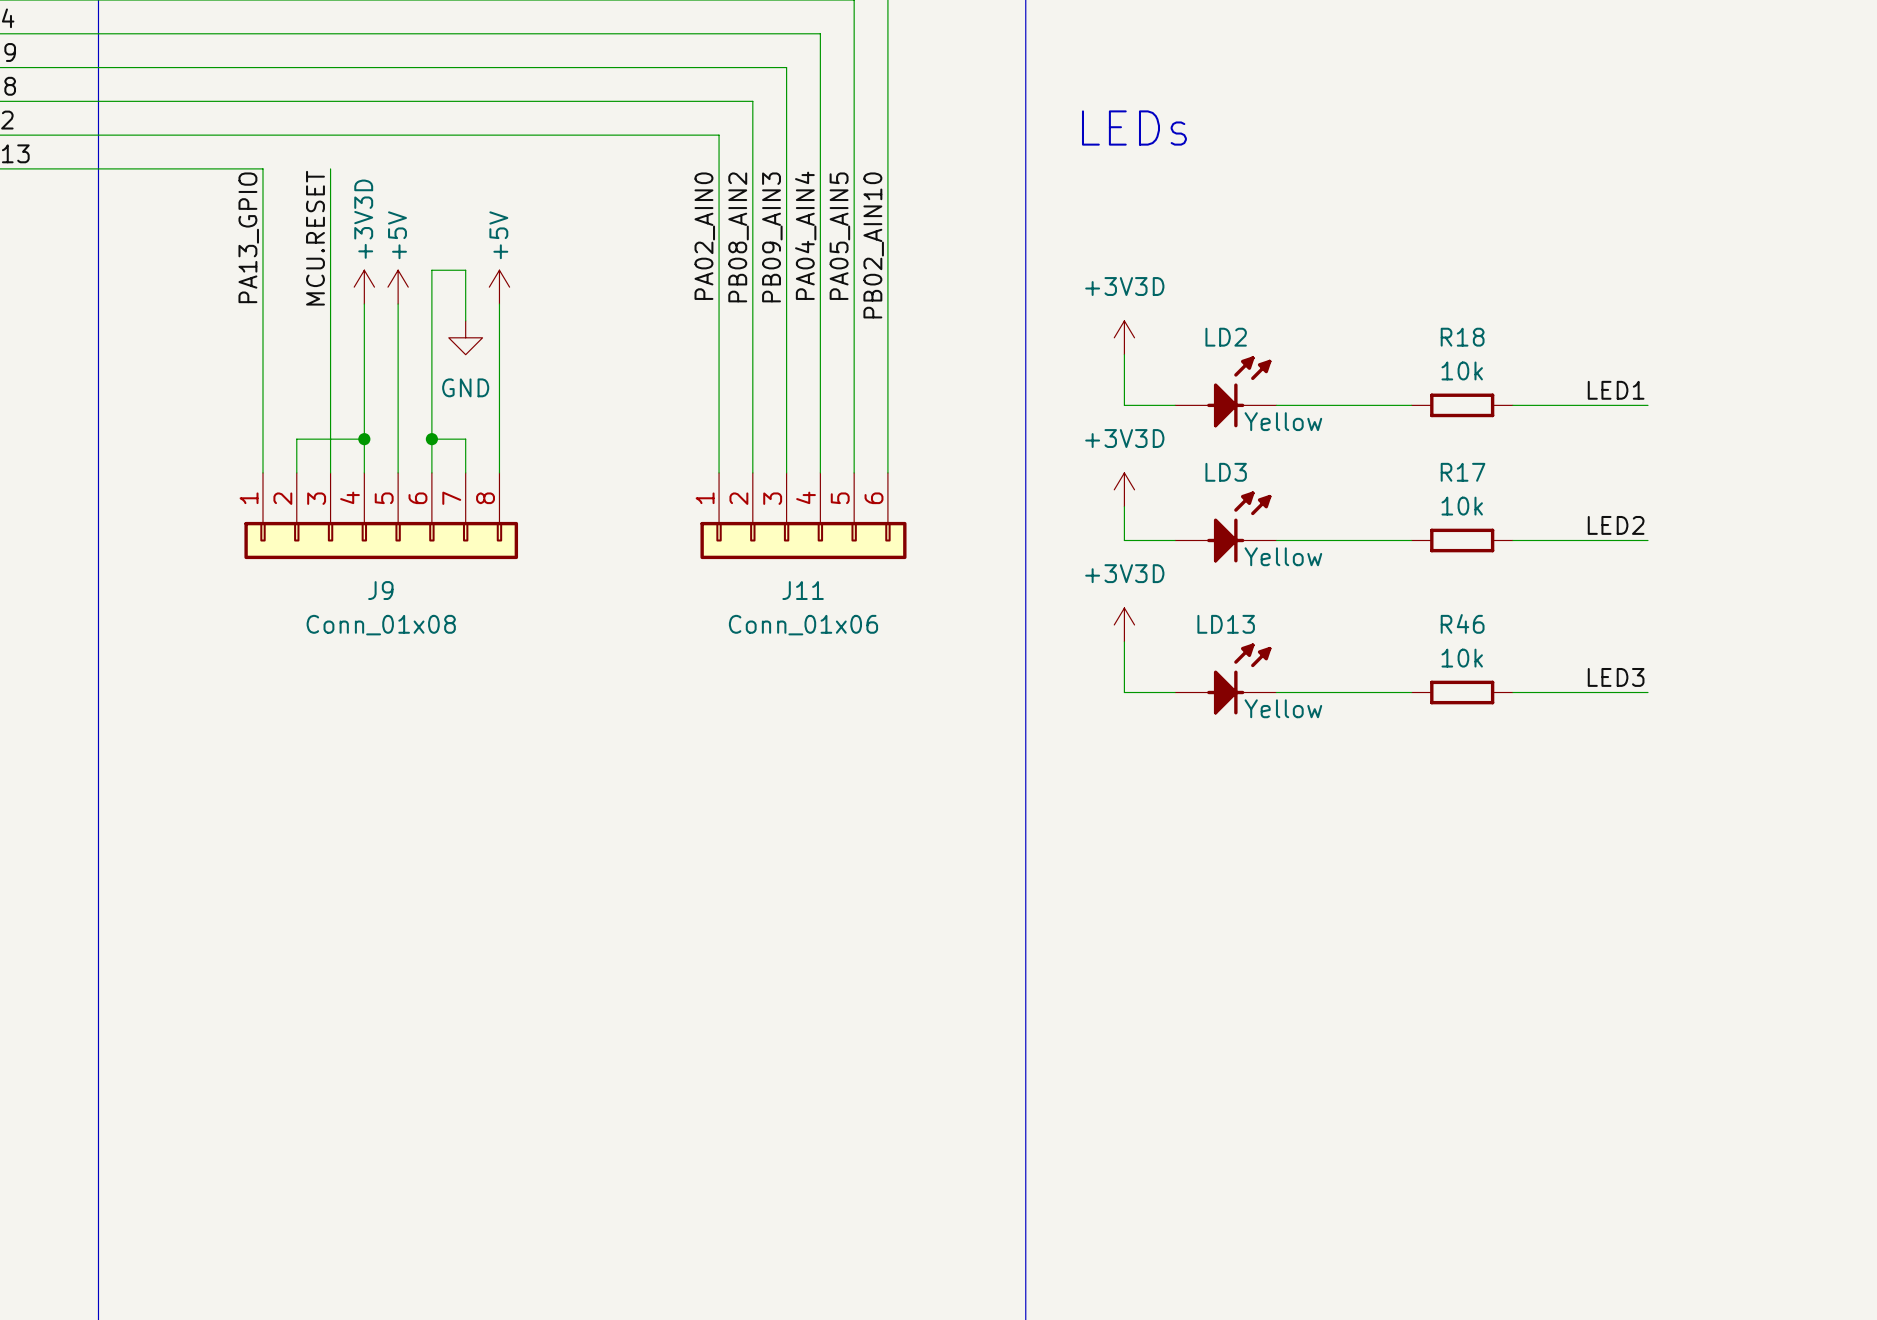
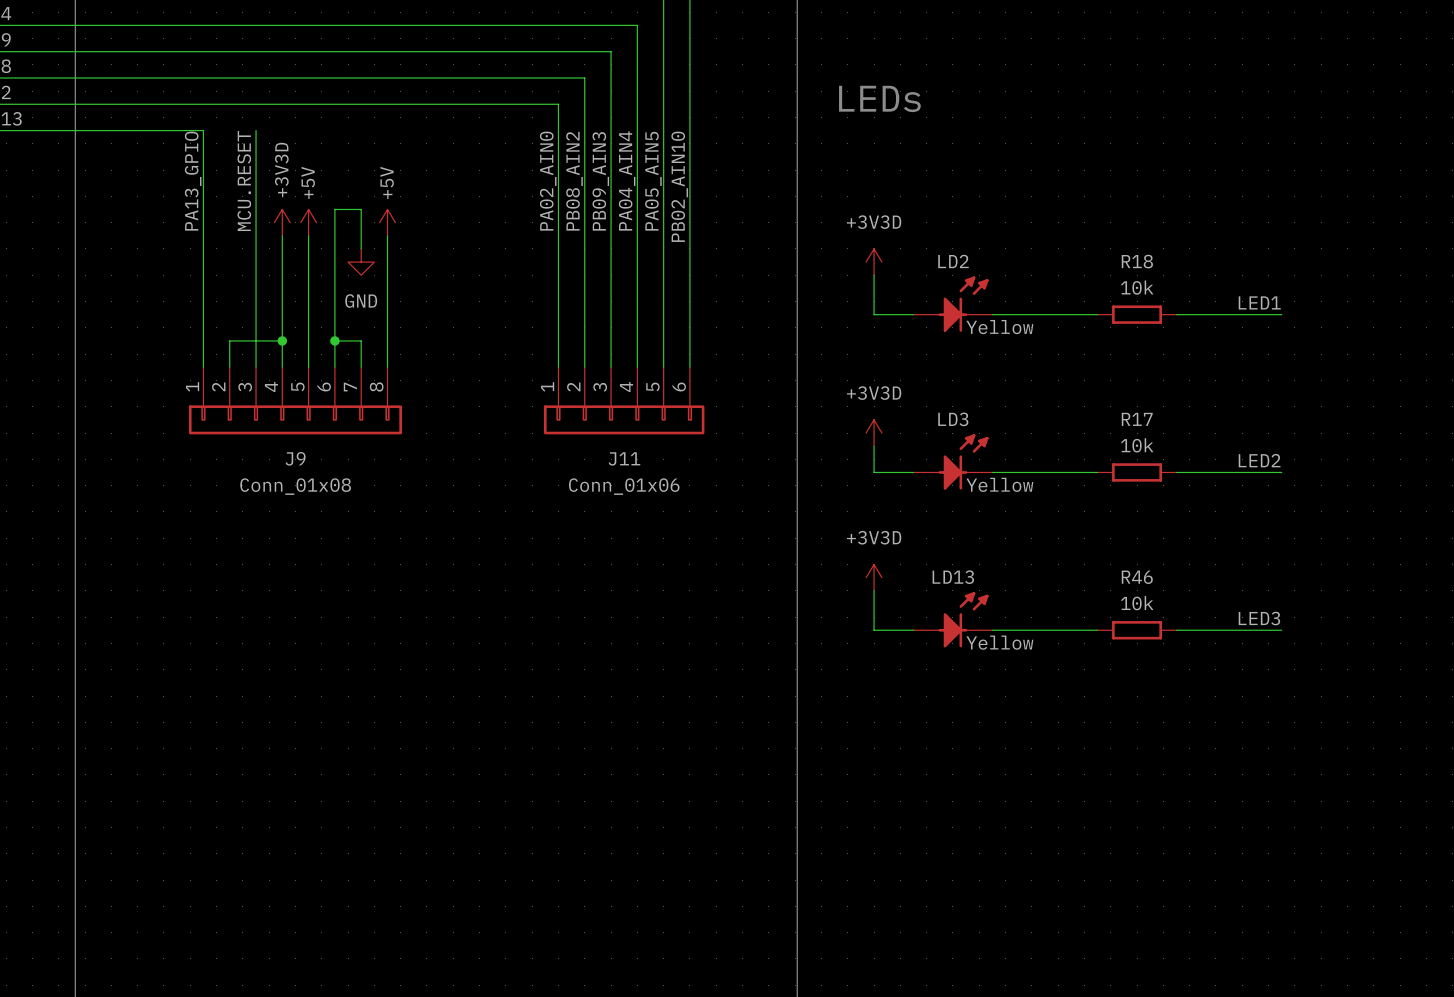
power symbol: +3V3D (1124, 489) -> none
wire: (1124, 506) (1124, 540) (1175, 540) -> (874, 446) (874, 472) (913, 472)
label position: LED2 (1616, 525) -> LED2 (1259, 460)
LD3 position: (1225, 526) -> (952, 461)
wire: (1276, 540) (1411, 540) -> (992, 472) (1097, 472)
R17 position: (1462, 540) -> (1137, 472)
wire: (1512, 540) (1648, 540) -> (1176, 472) (1281, 472)
power symbol: none -> +3V3D (874, 433)
power symbol: +3V3D (1124, 624) -> none
wire: (1124, 641) (1124, 692) (1175, 692) -> (874, 590) (874, 630) (913, 630)
label position: LED3 (1616, 677) -> LED3 (1259, 618)
LD13 position: (1225, 679) -> (952, 619)
wire: (1276, 692) (1411, 692) -> (992, 630) (1097, 630)
R46 position: (1462, 692) -> (1137, 630)
wire: (1512, 692) (1648, 692) -> (1176, 630) (1281, 630)
power symbol: none -> +3V3D (874, 577)

